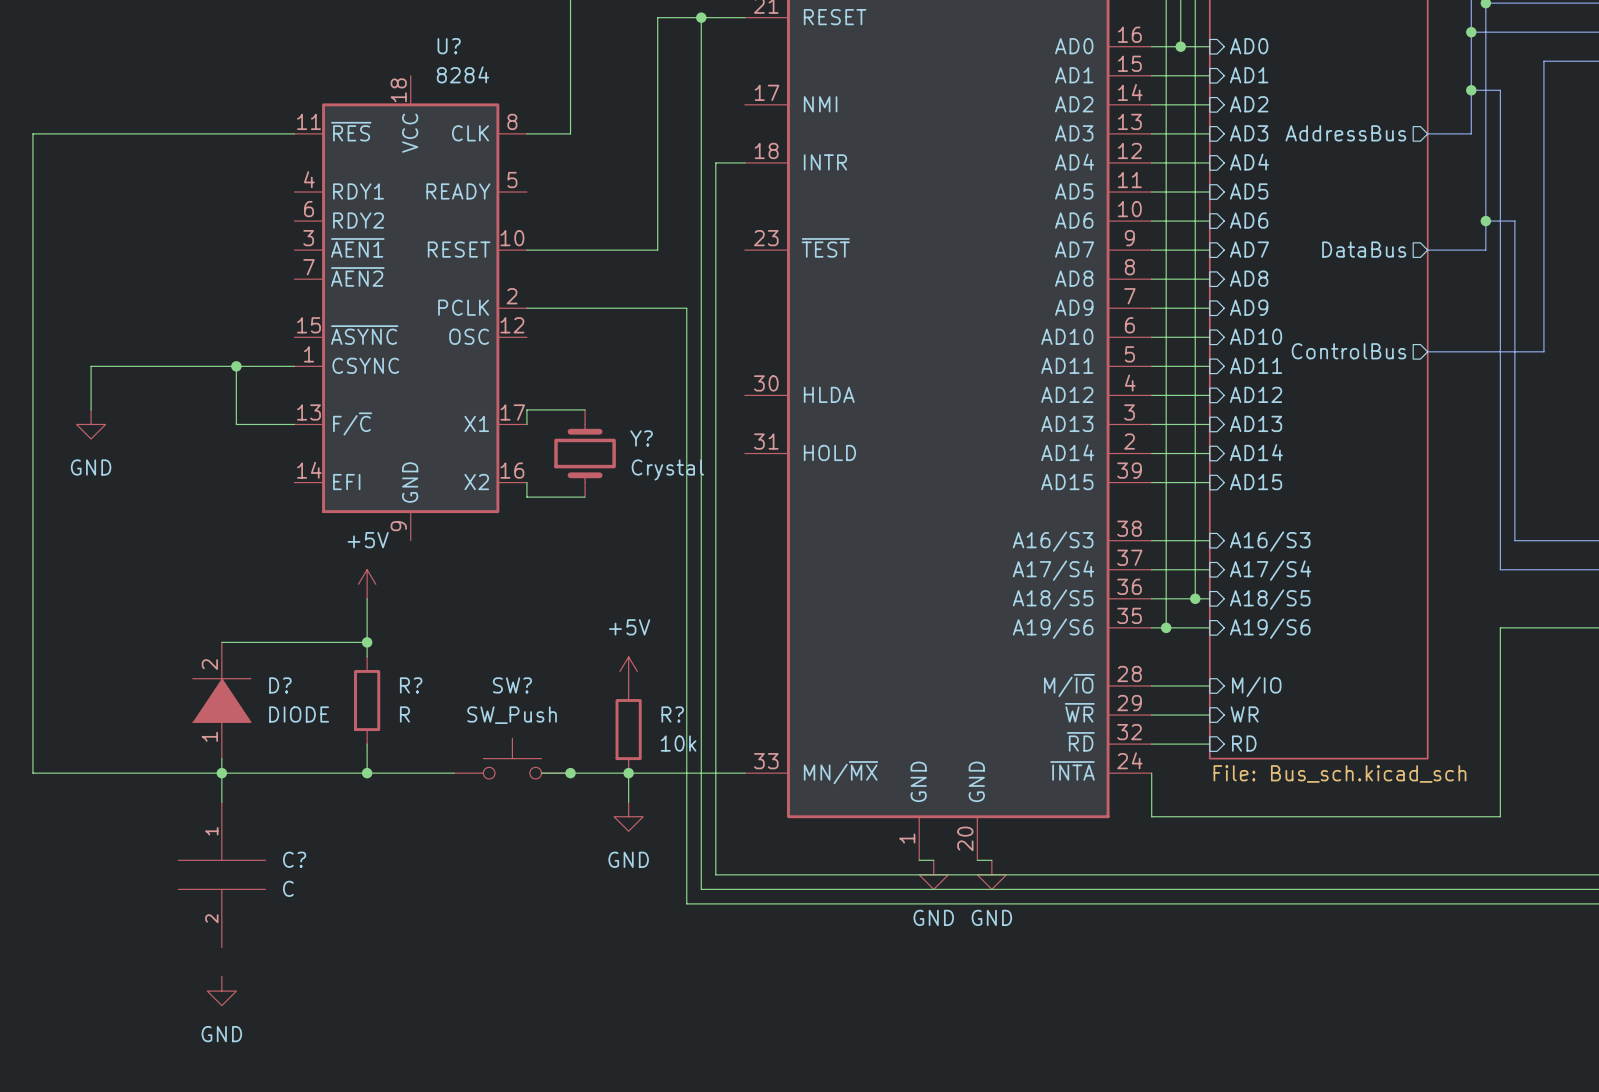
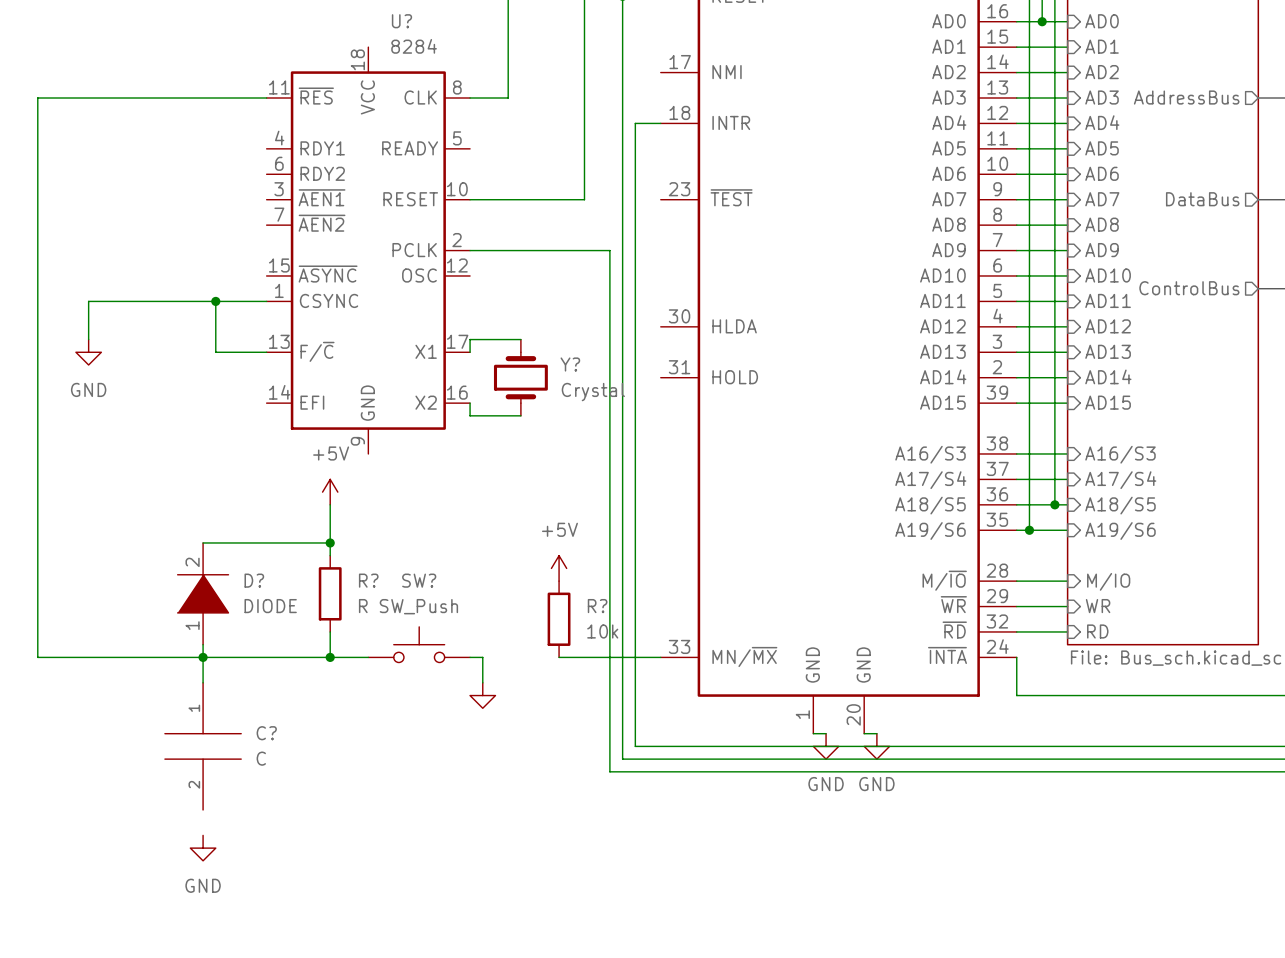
SW? position: (512, 758) -> (419, 644)
wire: none -> (470, 657) (482, 657) (482, 682)
wire: (541, 773) (628, 773) (628, 802) -> none
junction: (570, 773) -> none
junction: (628, 773) -> none
power symbol: none -> (482, 695)
power symbol: GND (628, 816) -> none

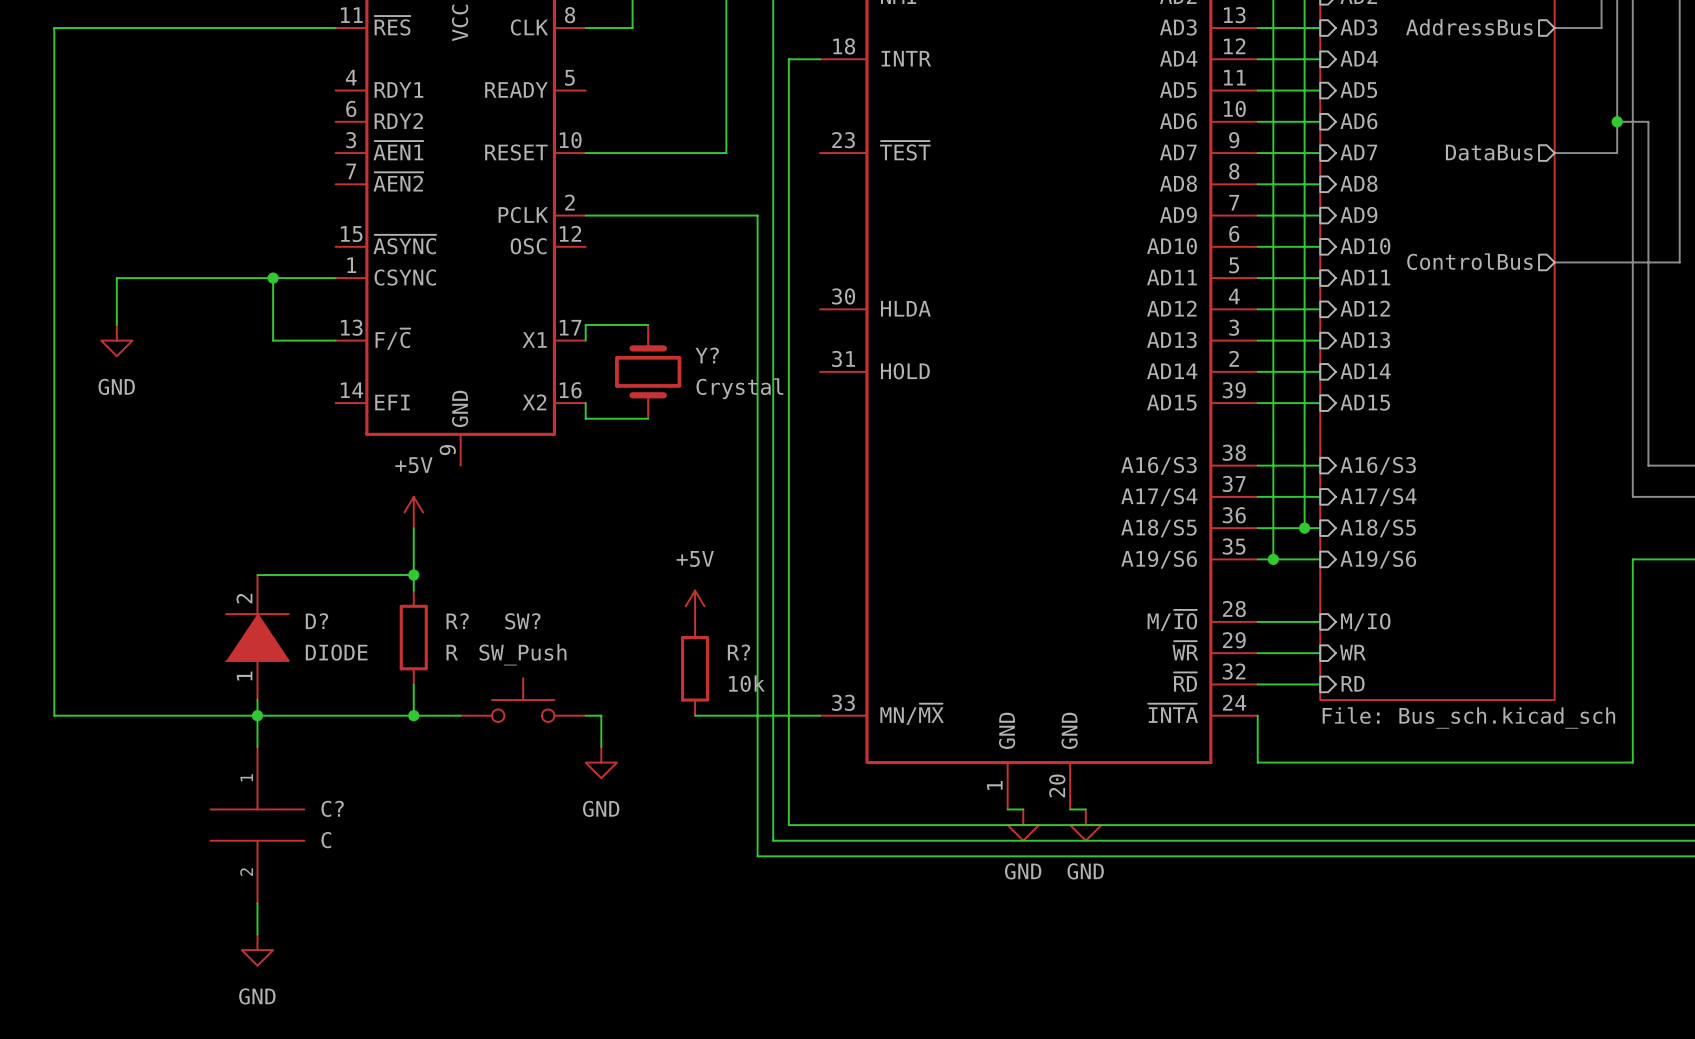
power symbol text: none -> GND (601, 808)
wire: none -> (257, 903) (257, 934)

